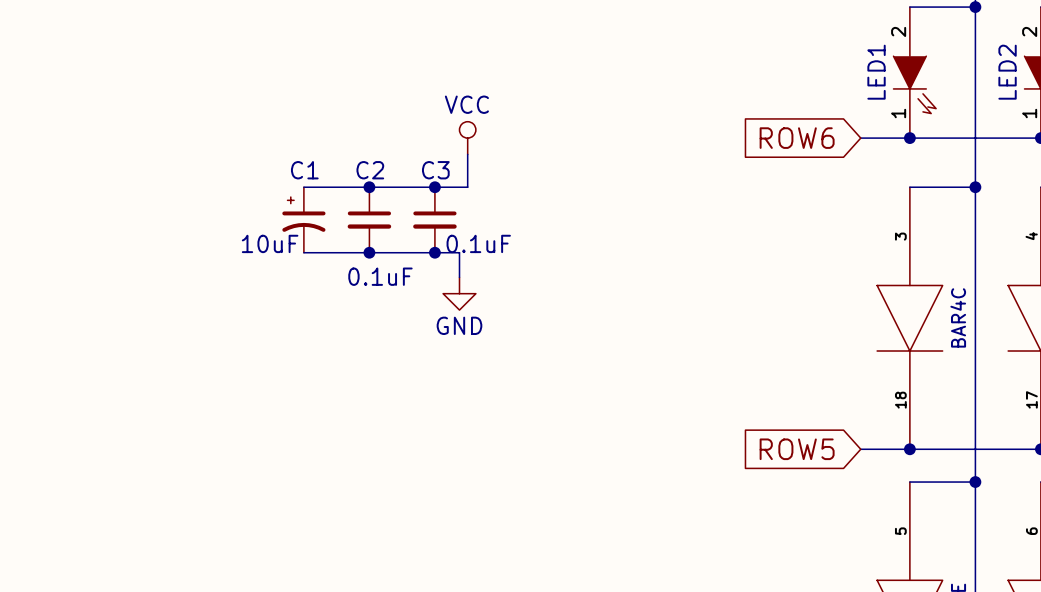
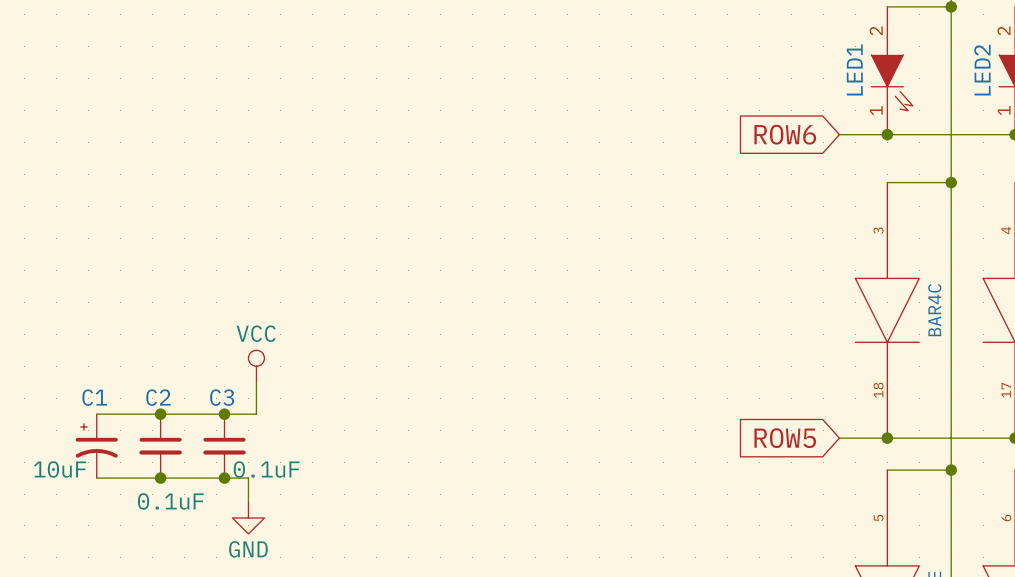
power symbol: VCC (467, 138) -> none
wire: (467, 154) (467, 187) (303, 187) -> (256, 382) (256, 414) (96, 414)
junction: (369, 187) -> none
junction: (434, 187) -> none
C1 position: (303, 219) -> (96, 446)
C2 position: (369, 219) -> (160, 446)
C3 position: (434, 219) -> (224, 446)
wire: (303, 252) (459, 252) (459, 277) -> (96, 478) (248, 478) (248, 502)
junction: (369, 252) -> none
junction: (434, 252) -> none
power symbol position: GND (459, 293) -> GND (248, 518)
power symbol: none -> VCC (256, 366)
junction: none -> (160, 414)
junction: none -> (224, 414)
junction: none -> (160, 478)
junction: none -> (224, 478)

